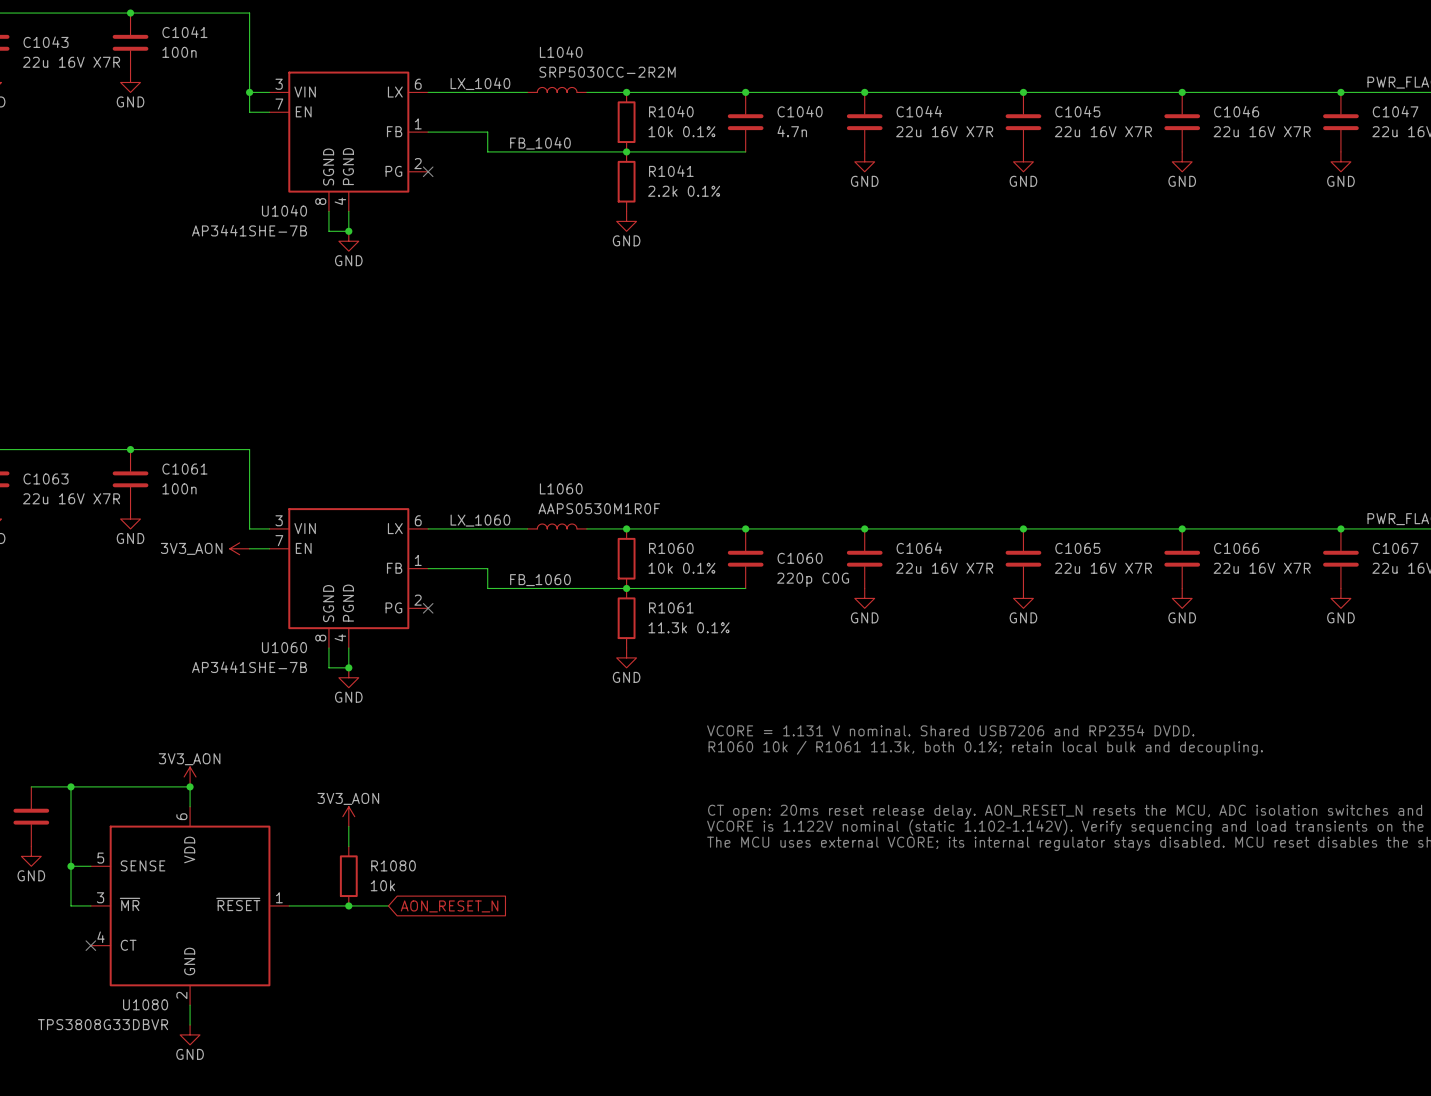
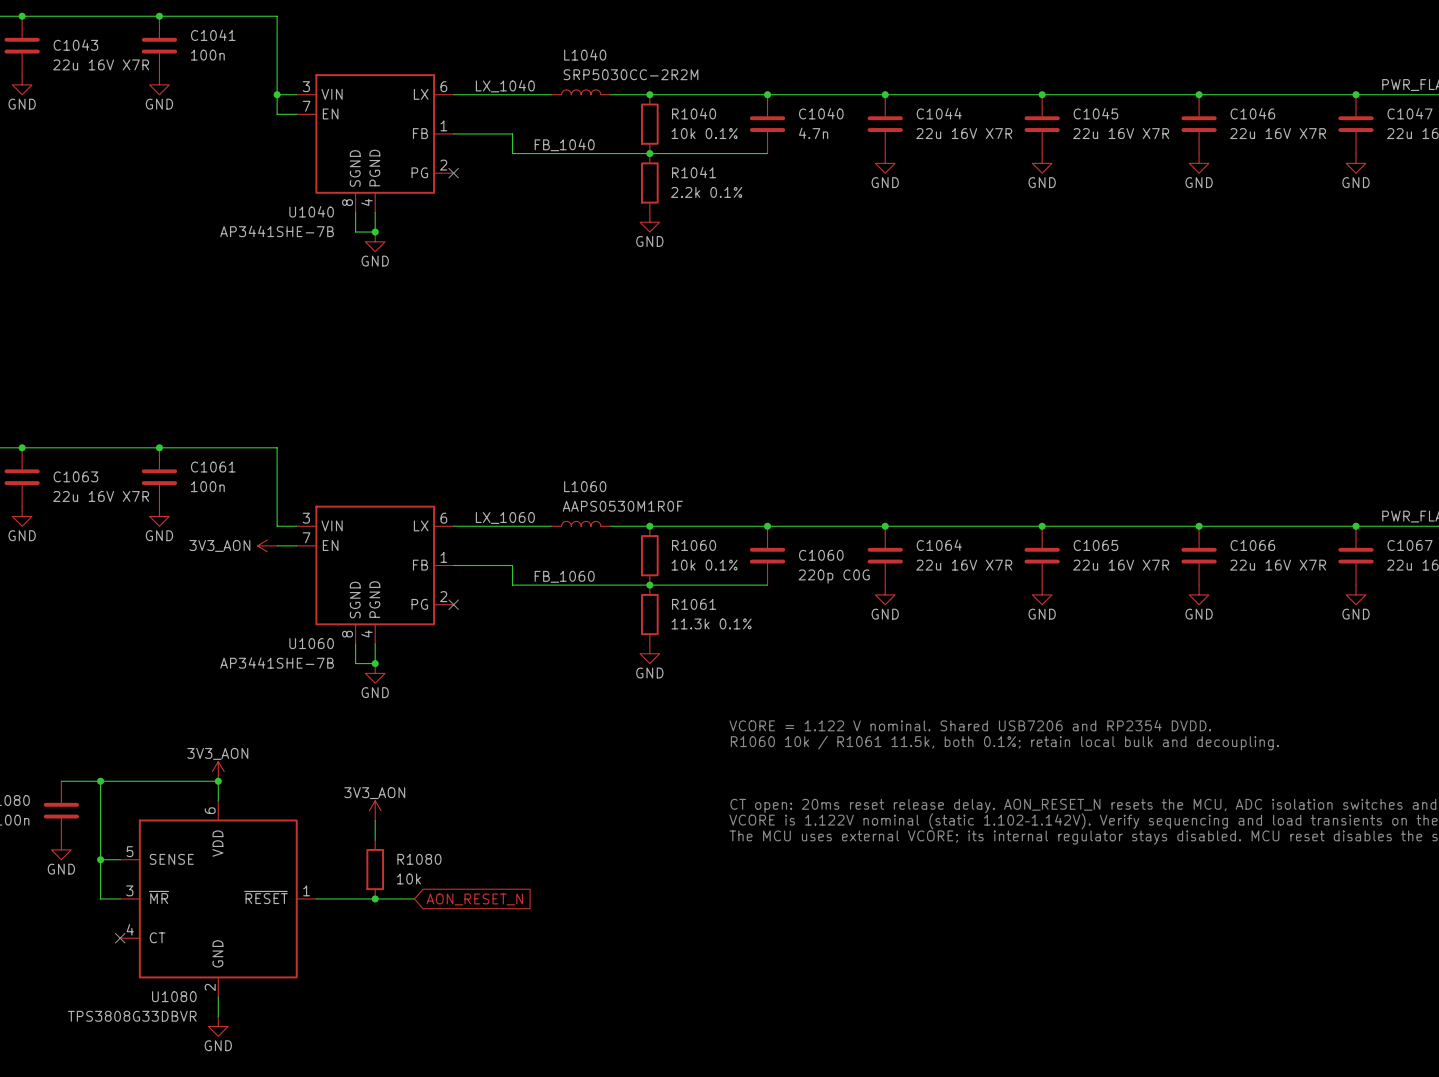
text: VCORE = 1.131 V nominal. Shared USB7206 and RP2354 DVDD. (950, 730) -> VCORE = 1.122 V nominal. Shared USB7206 and RP2354 DVDD. (970, 725)
text: R1060 10k / R1061 11.3k, both 0.1%; retain local bulk and decoupling. (985, 748) -> R1060 10k / R1061 11.5k, both 0.1%; retain local bulk and decoupling. (1004, 743)

